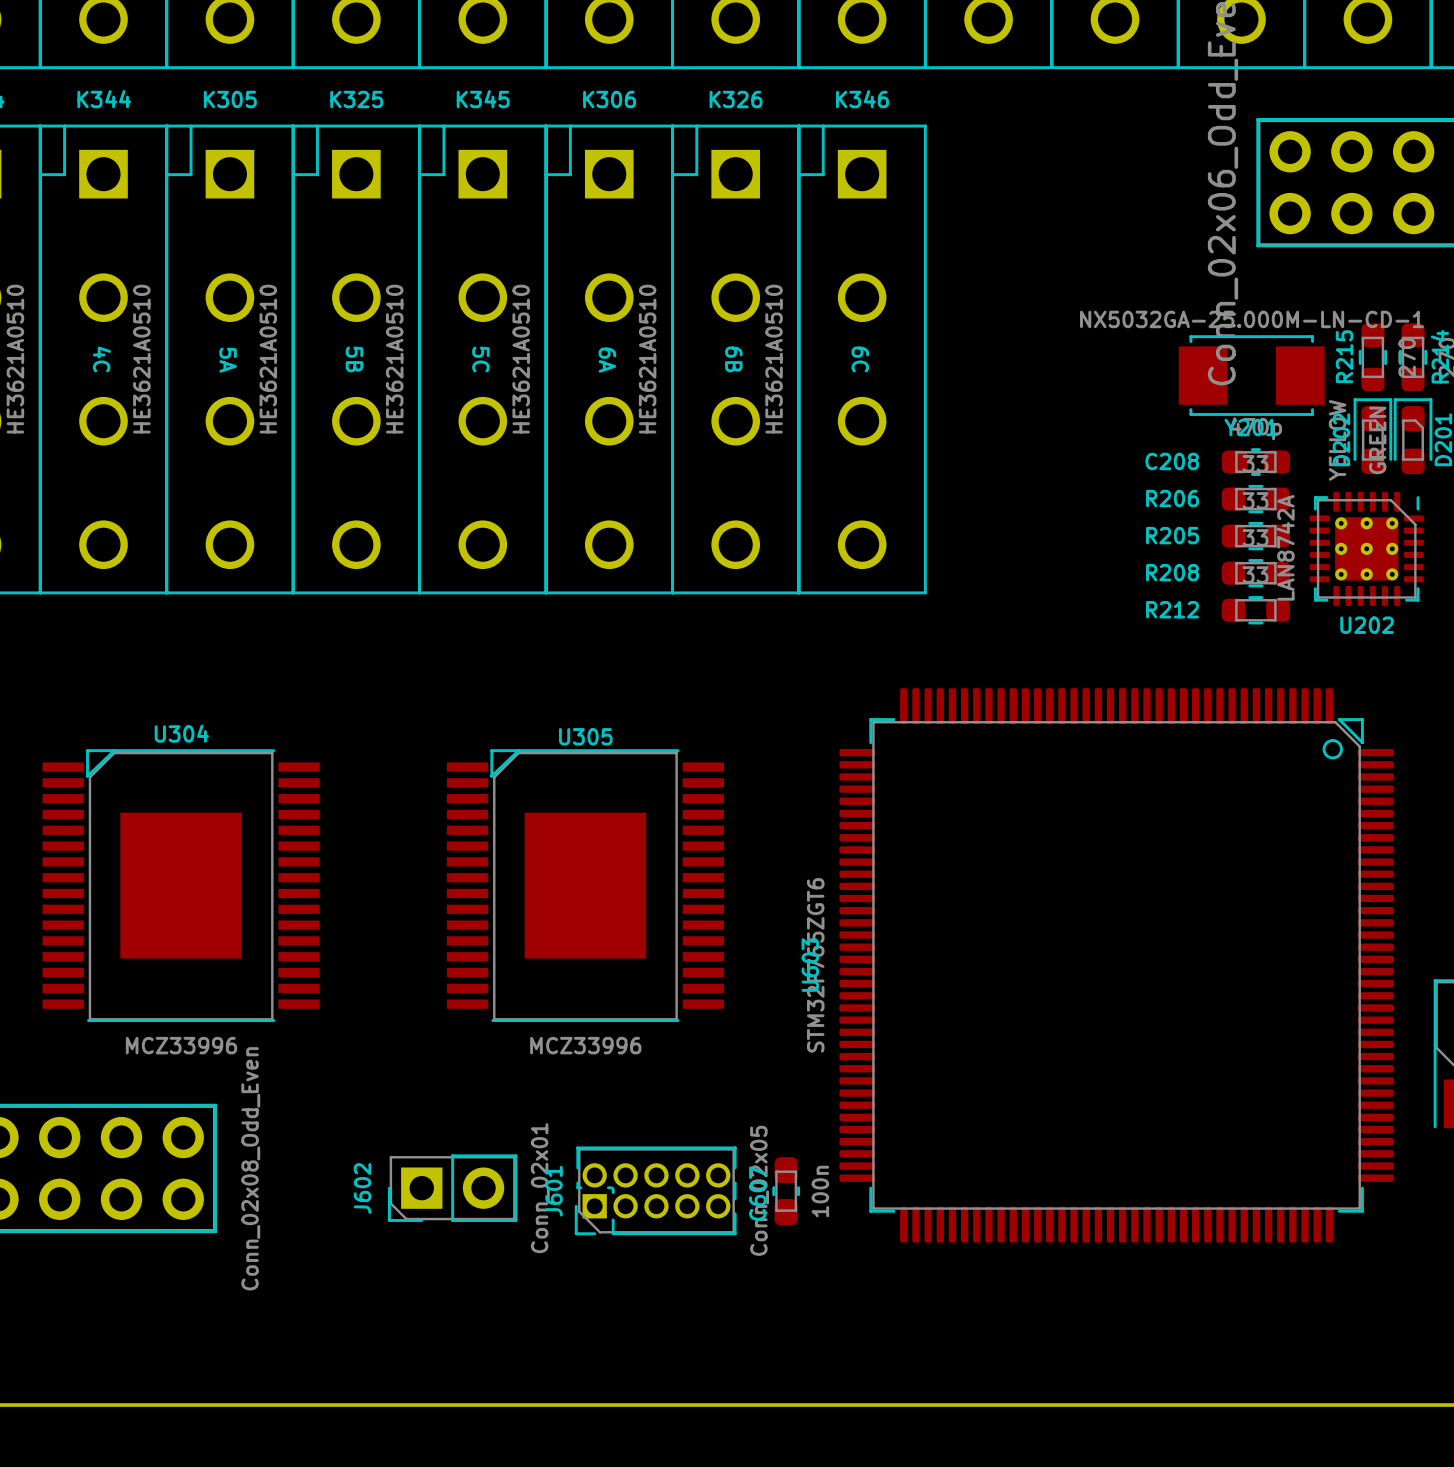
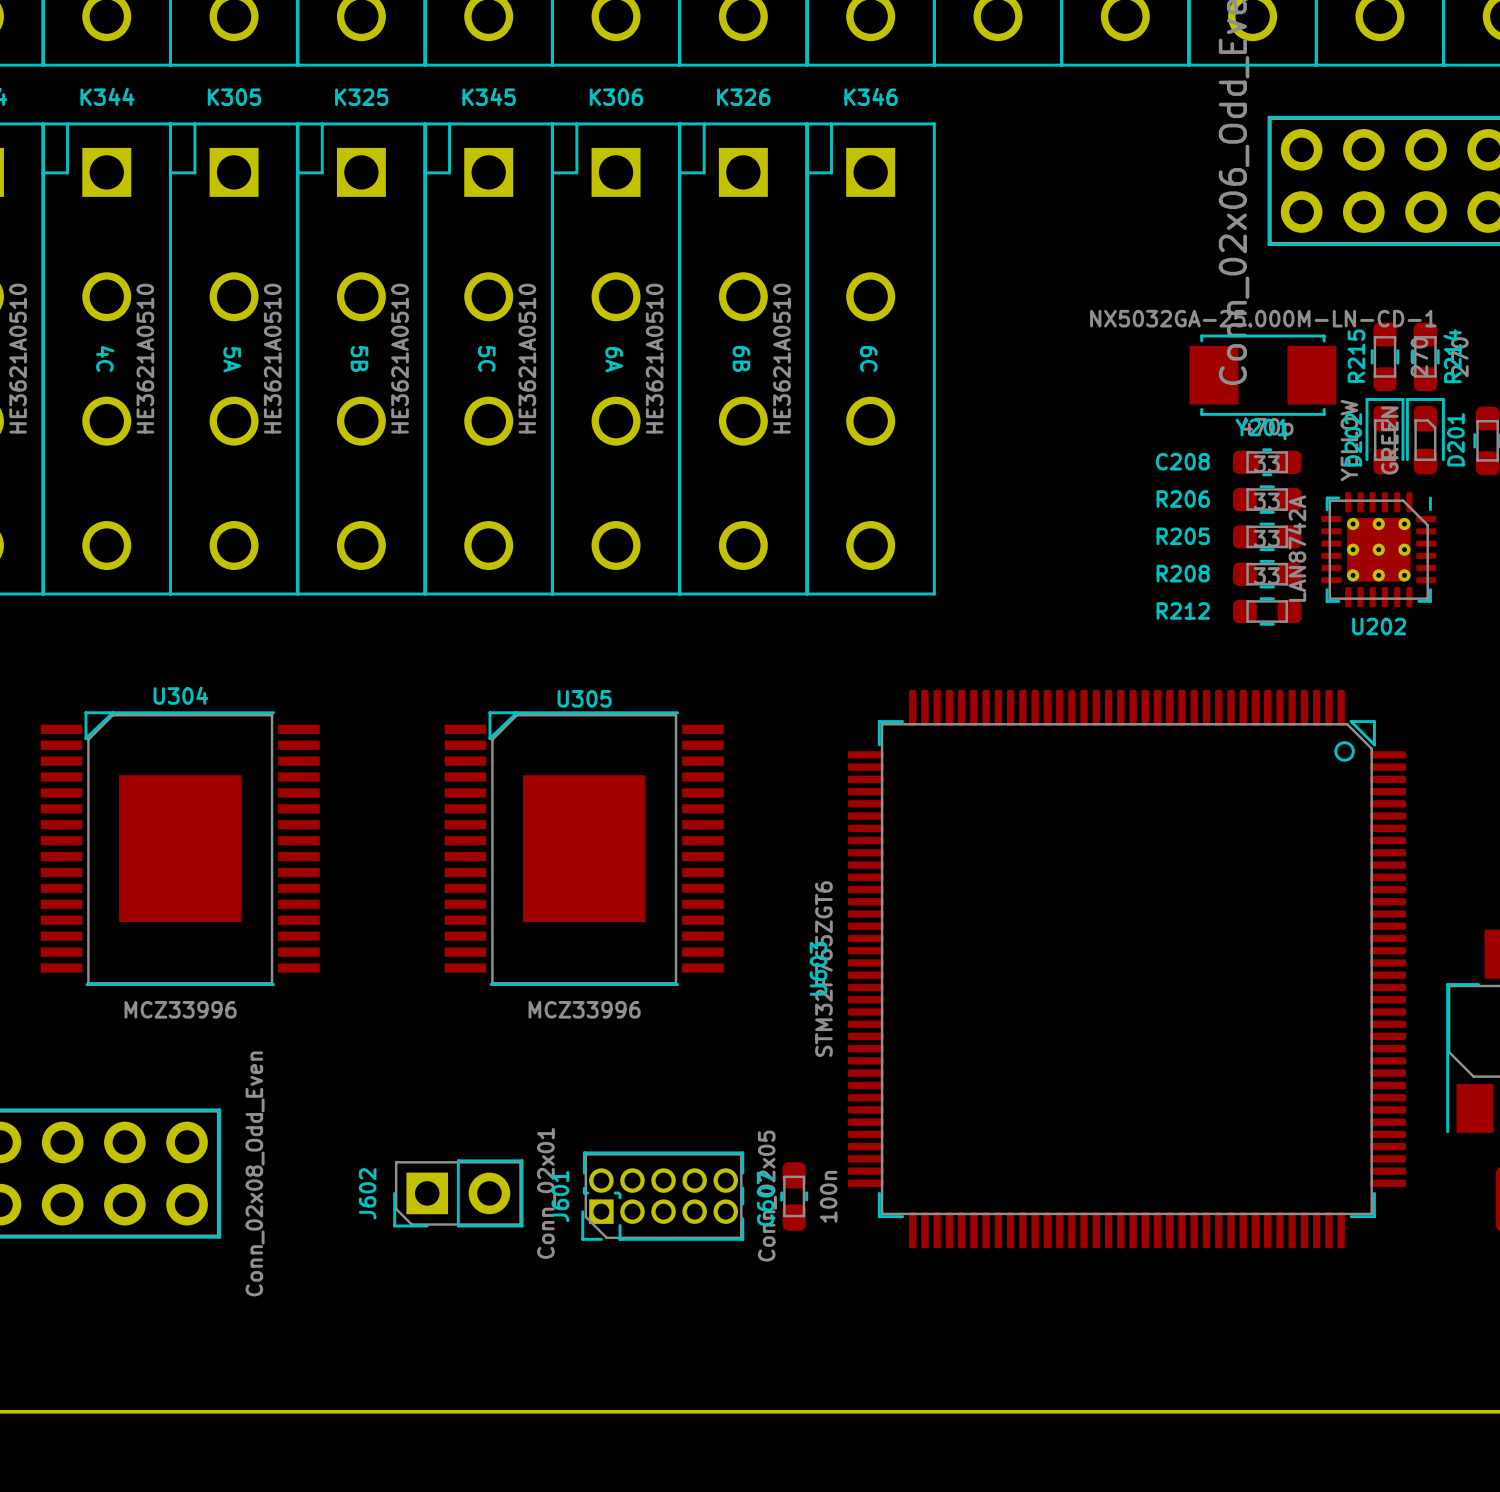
U304 position: (181, 885) -> (180, 848)
U305 position: (585, 885) -> (584, 848)

